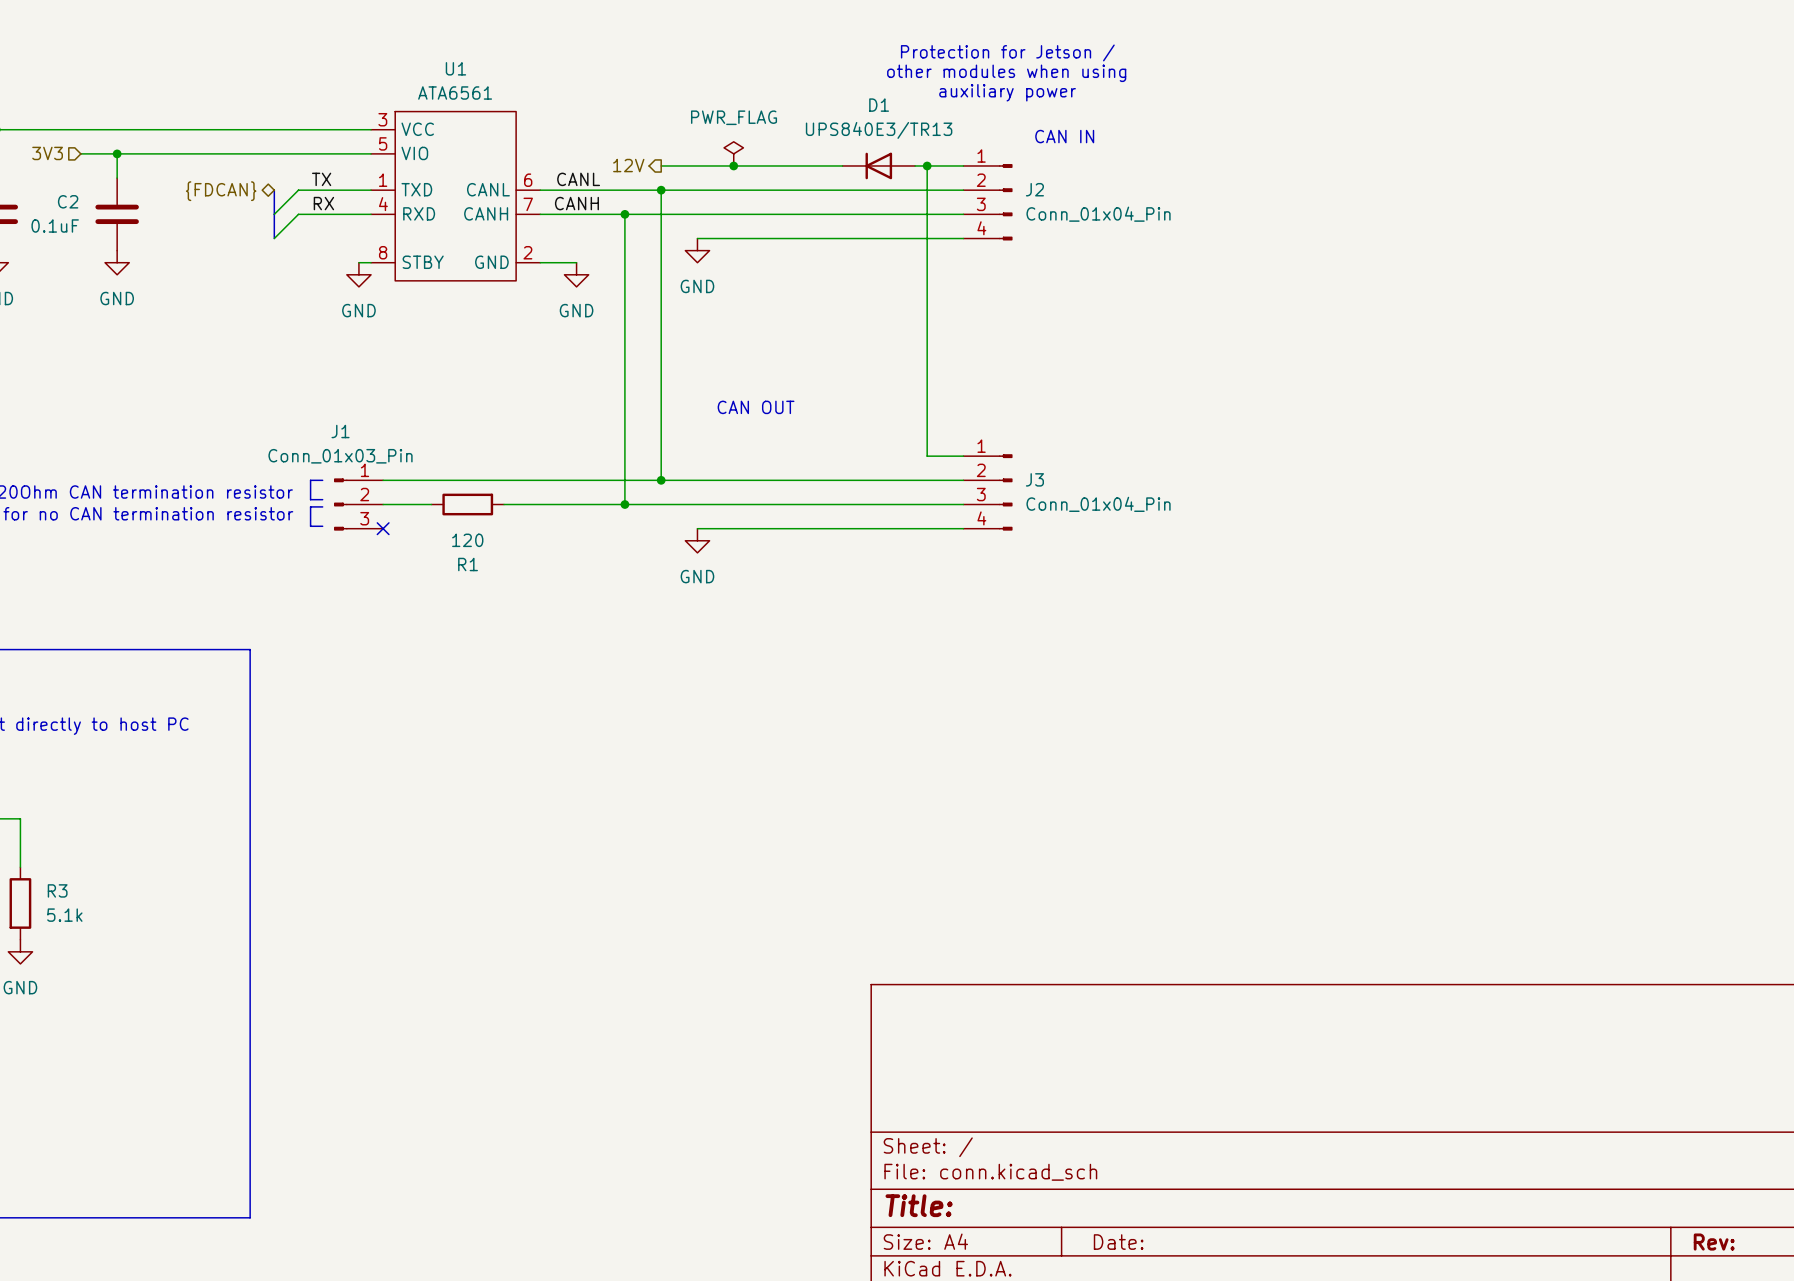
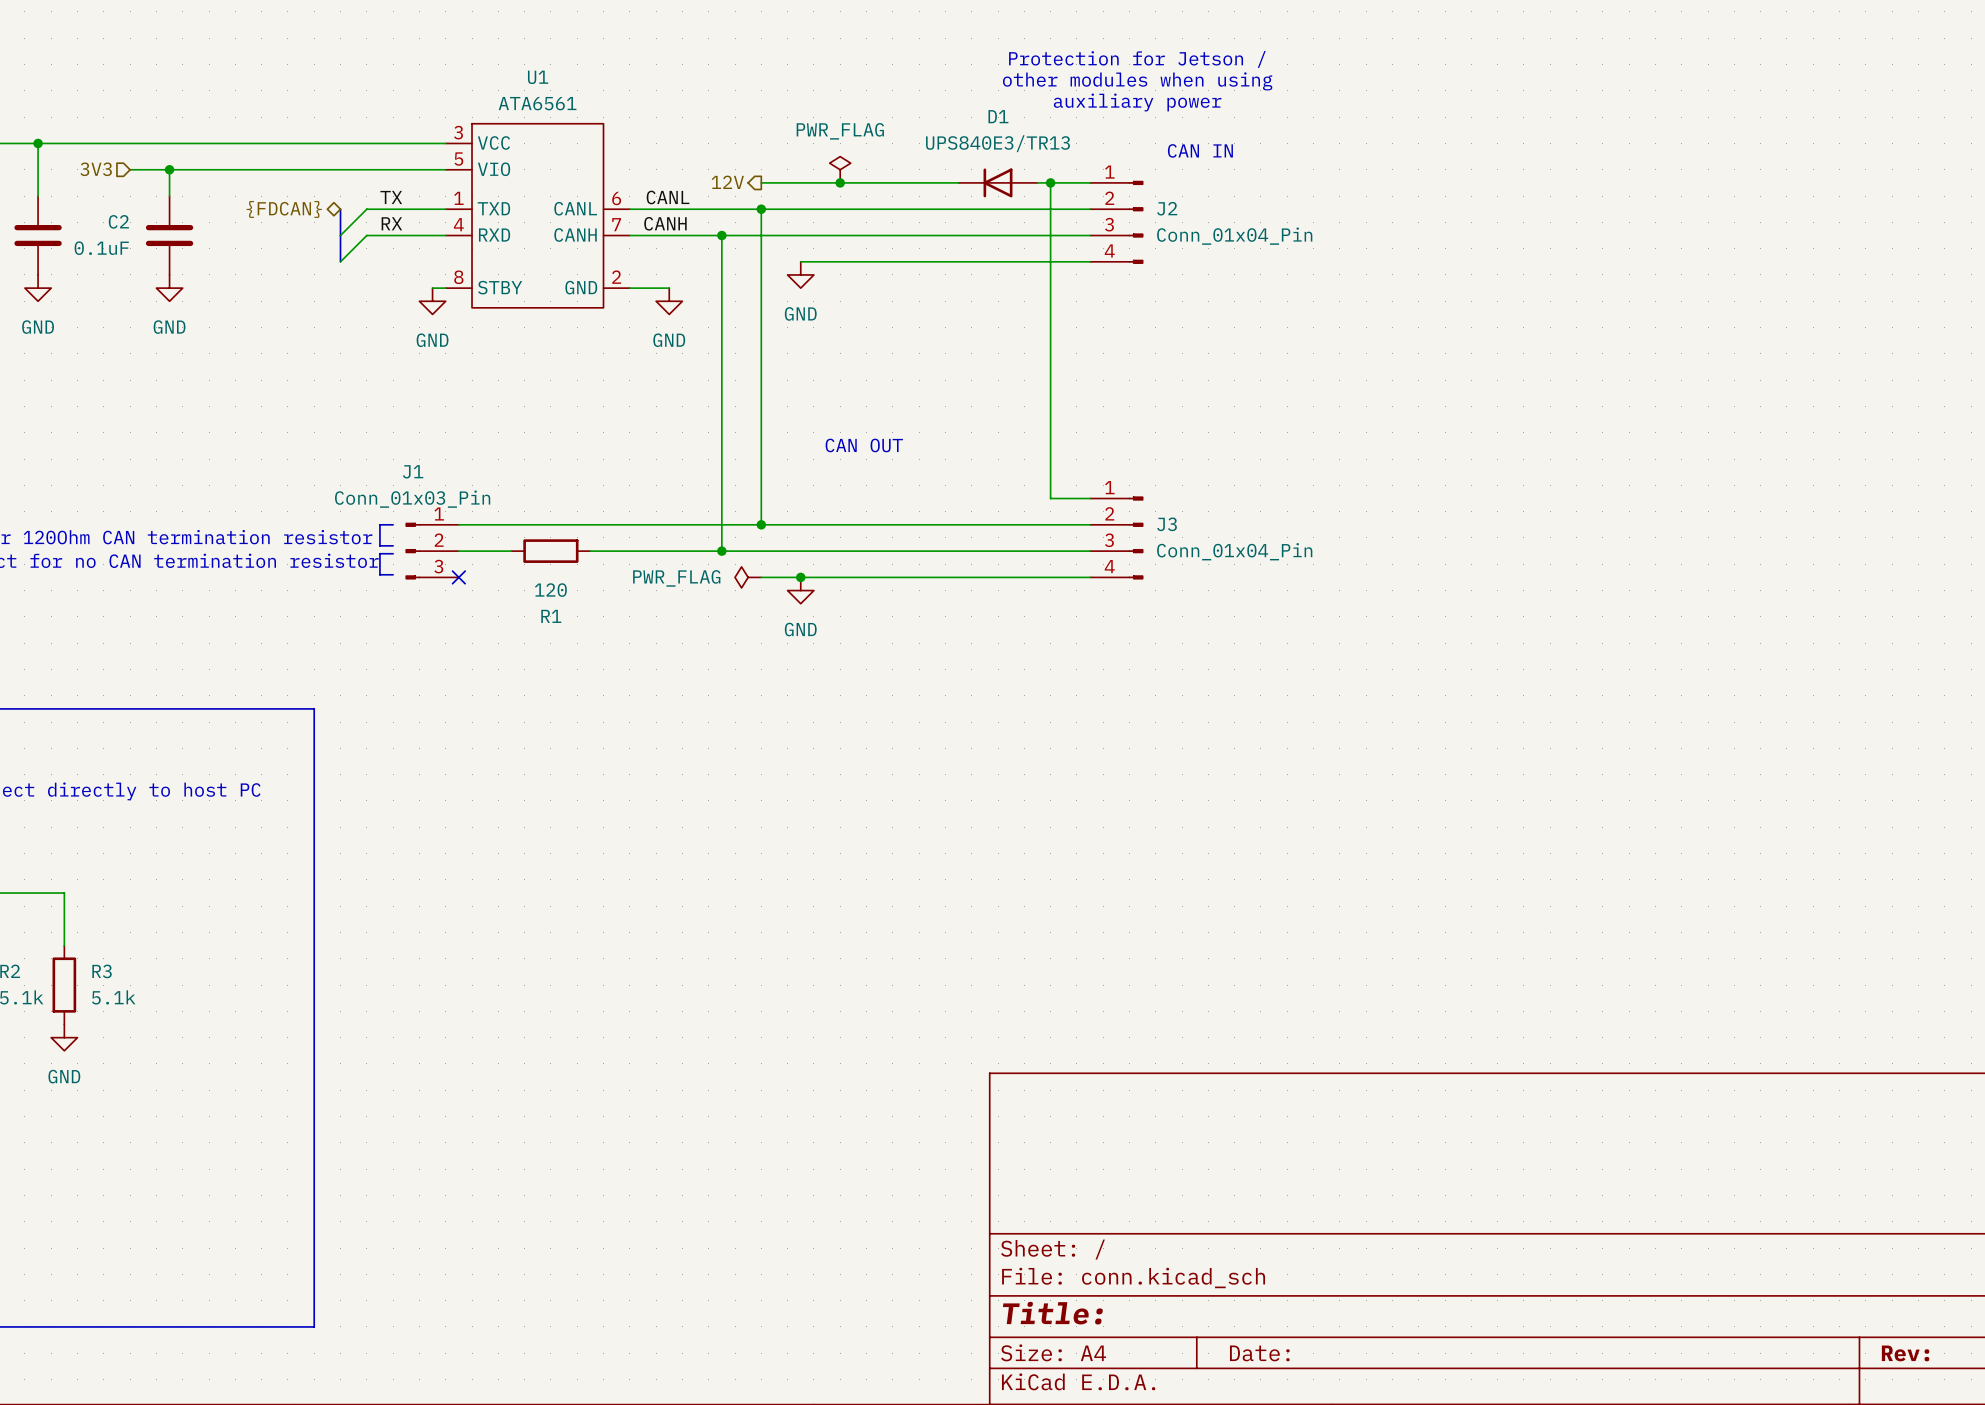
power symbol: none -> PWR_FLAG (748, 577)
wire: none -> (761, 577) (800, 577)
junction: none -> (800, 577)

